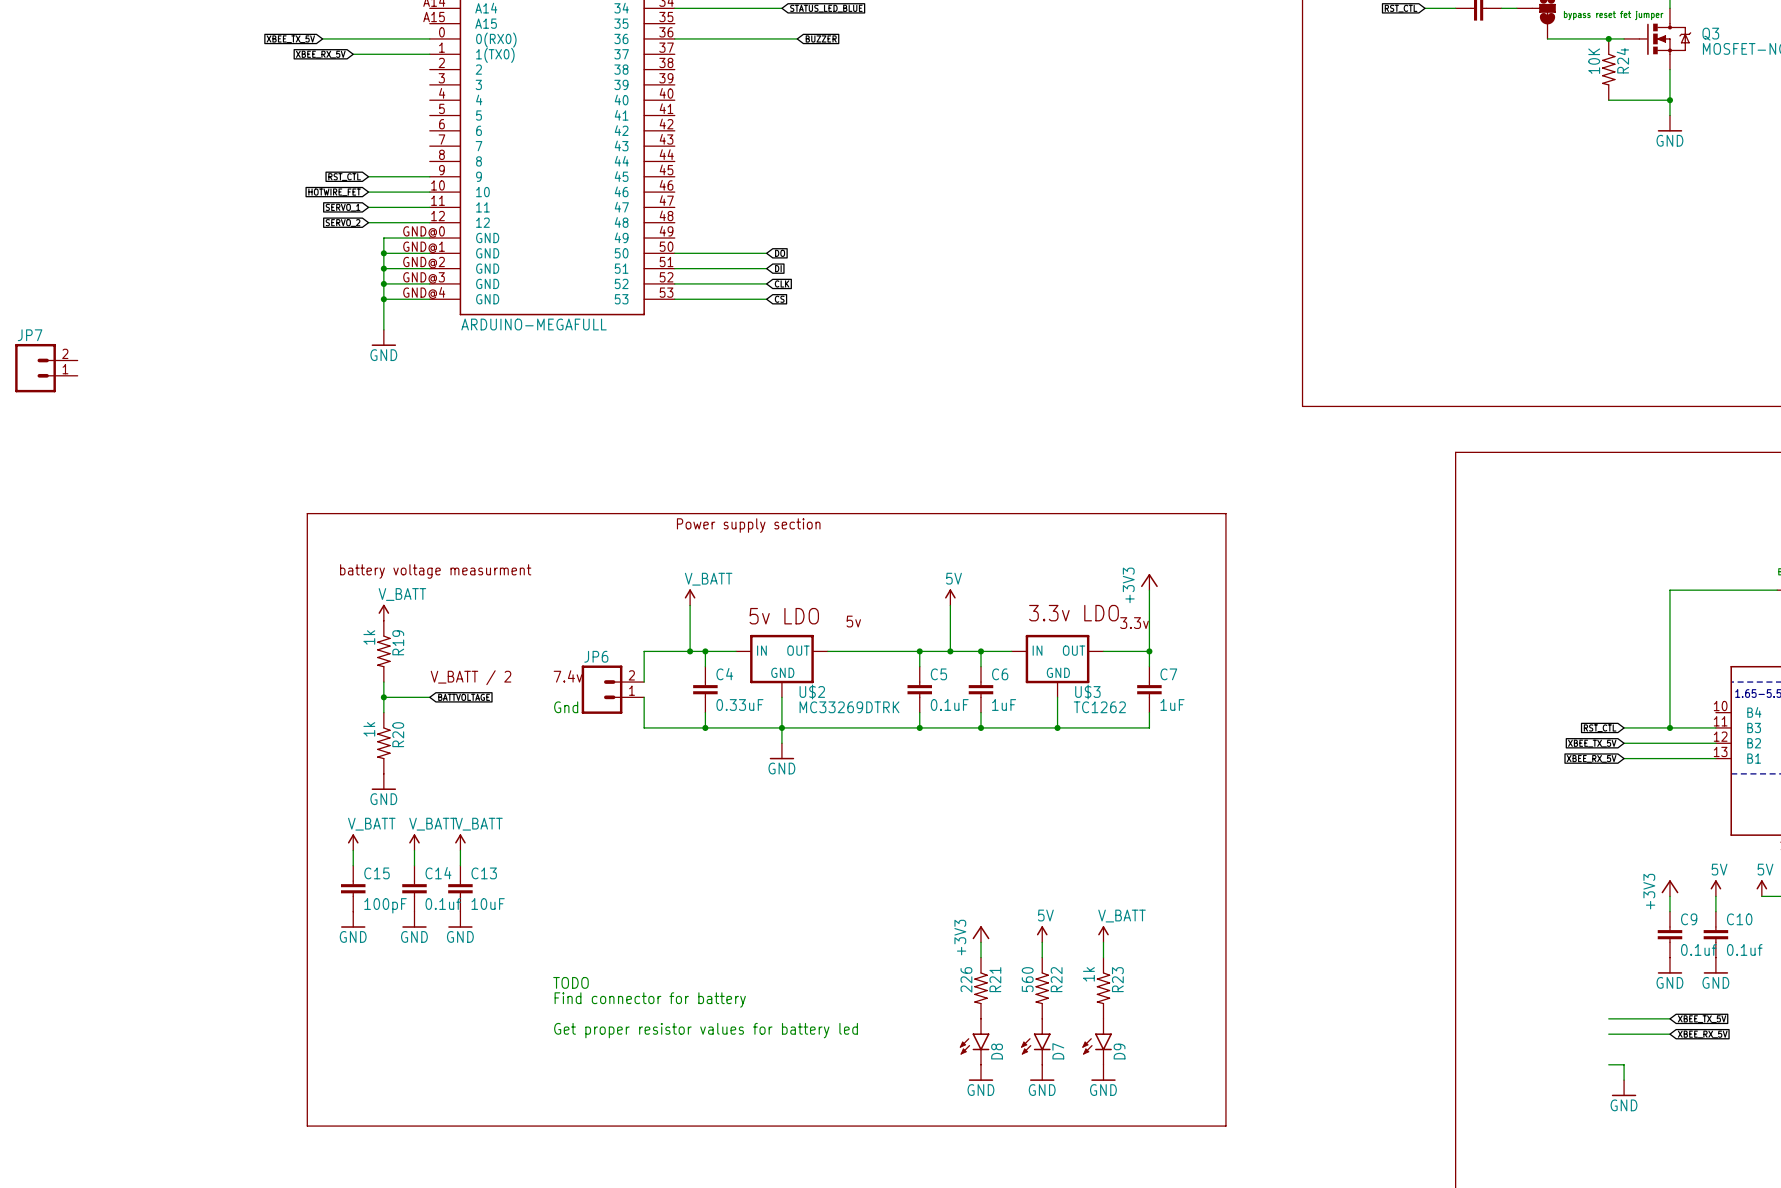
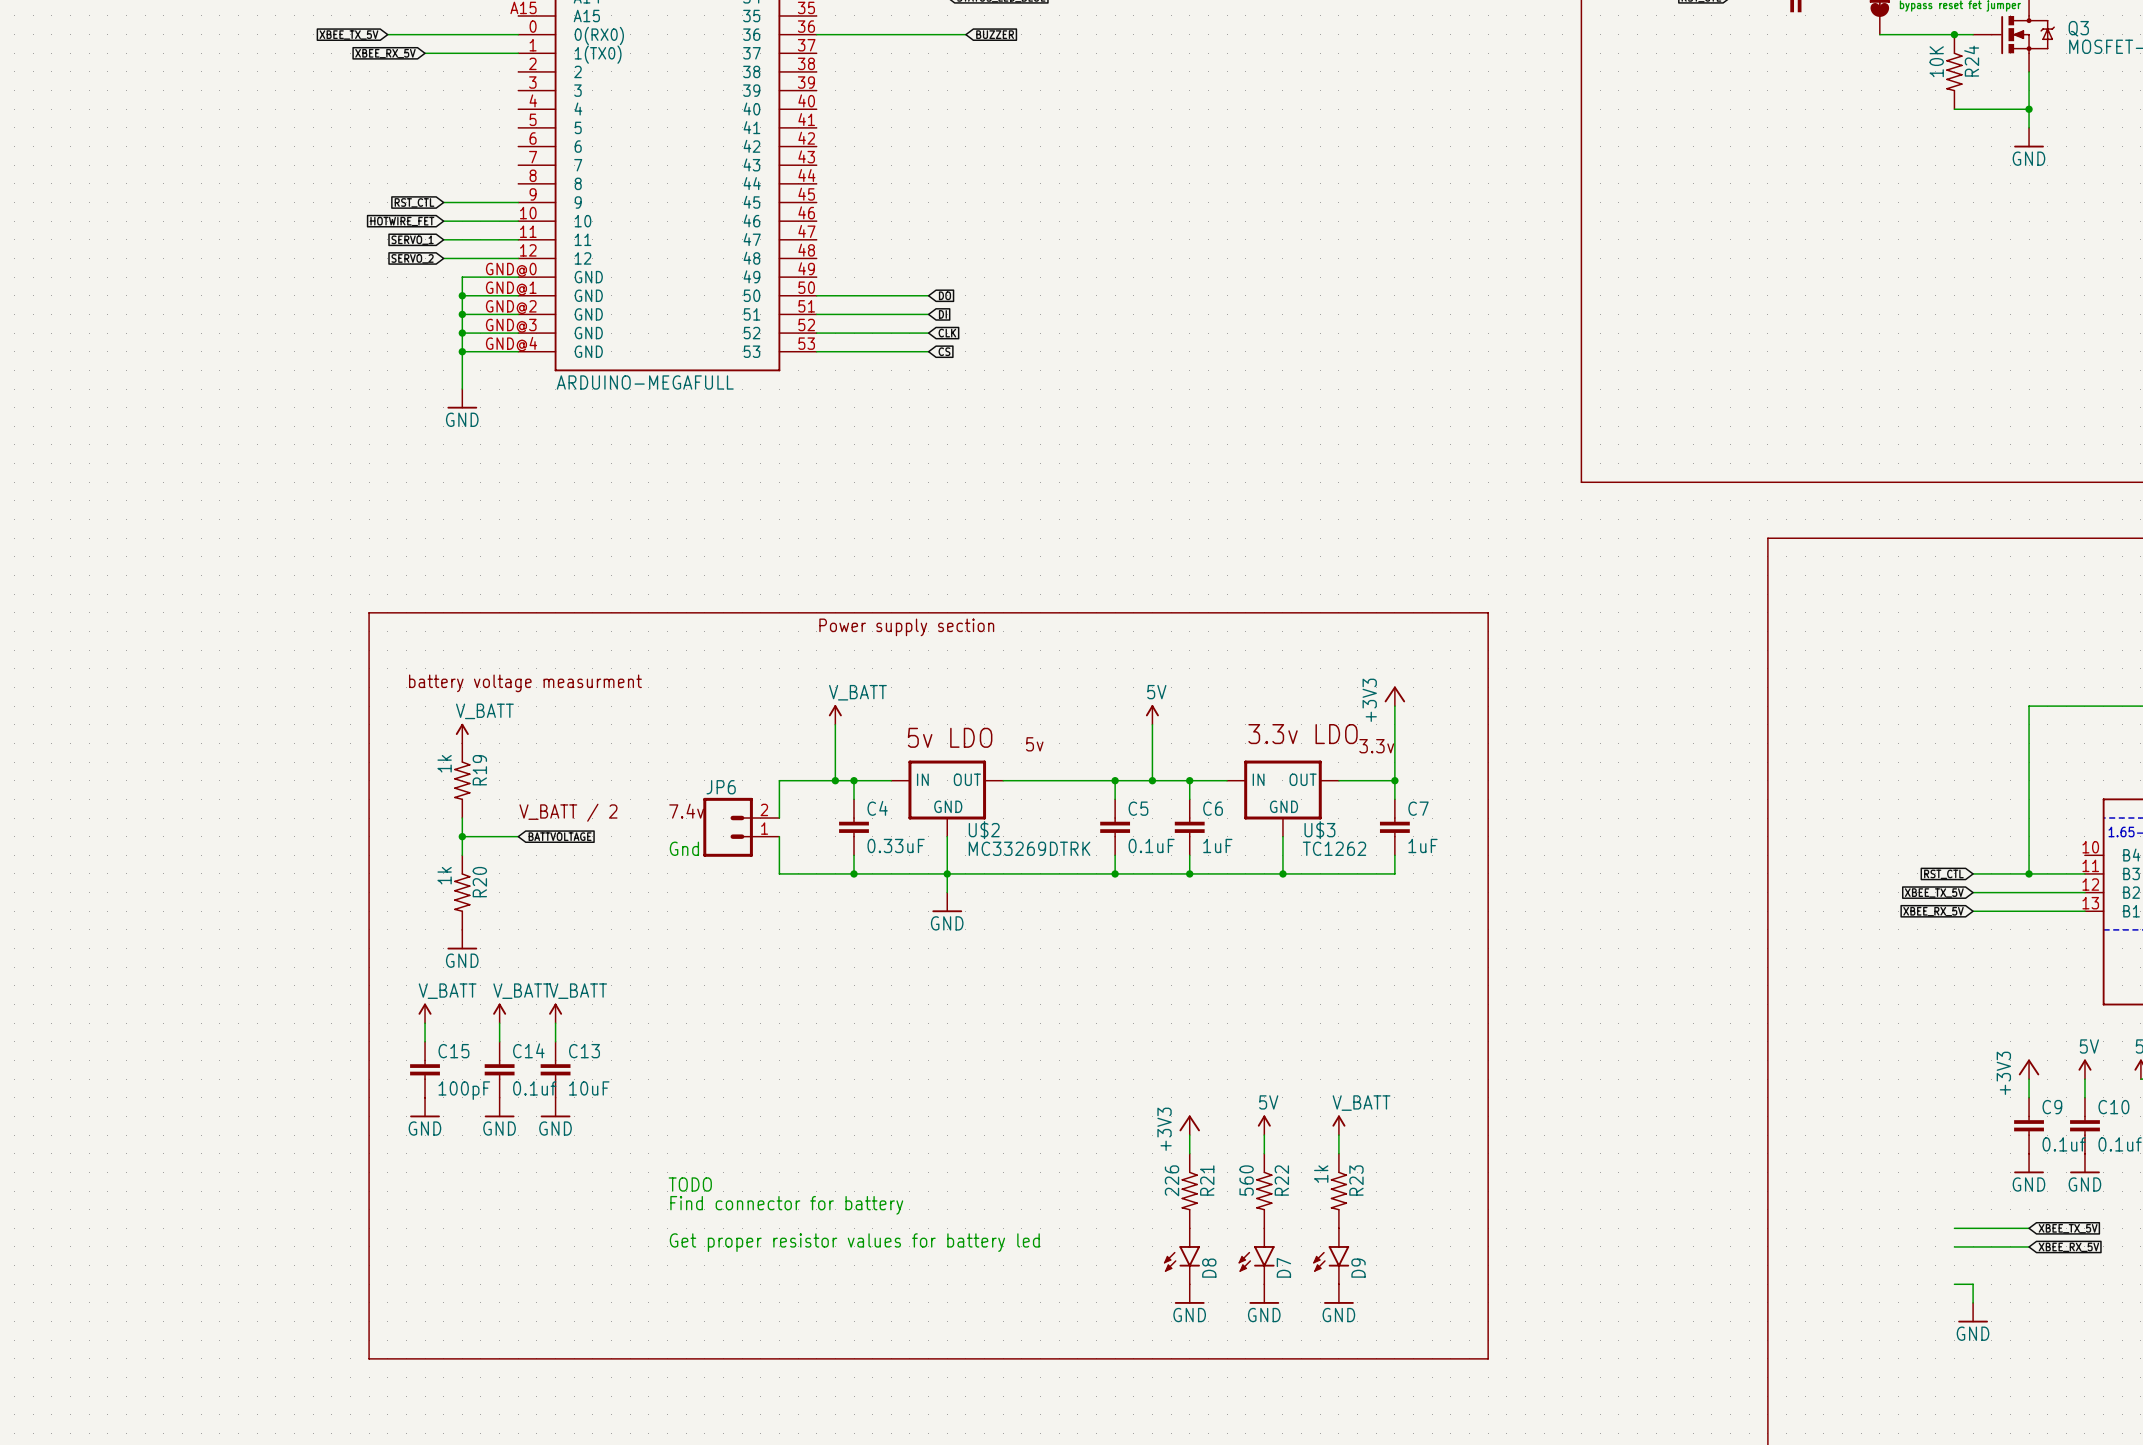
JP7: (46, 368) -> none

